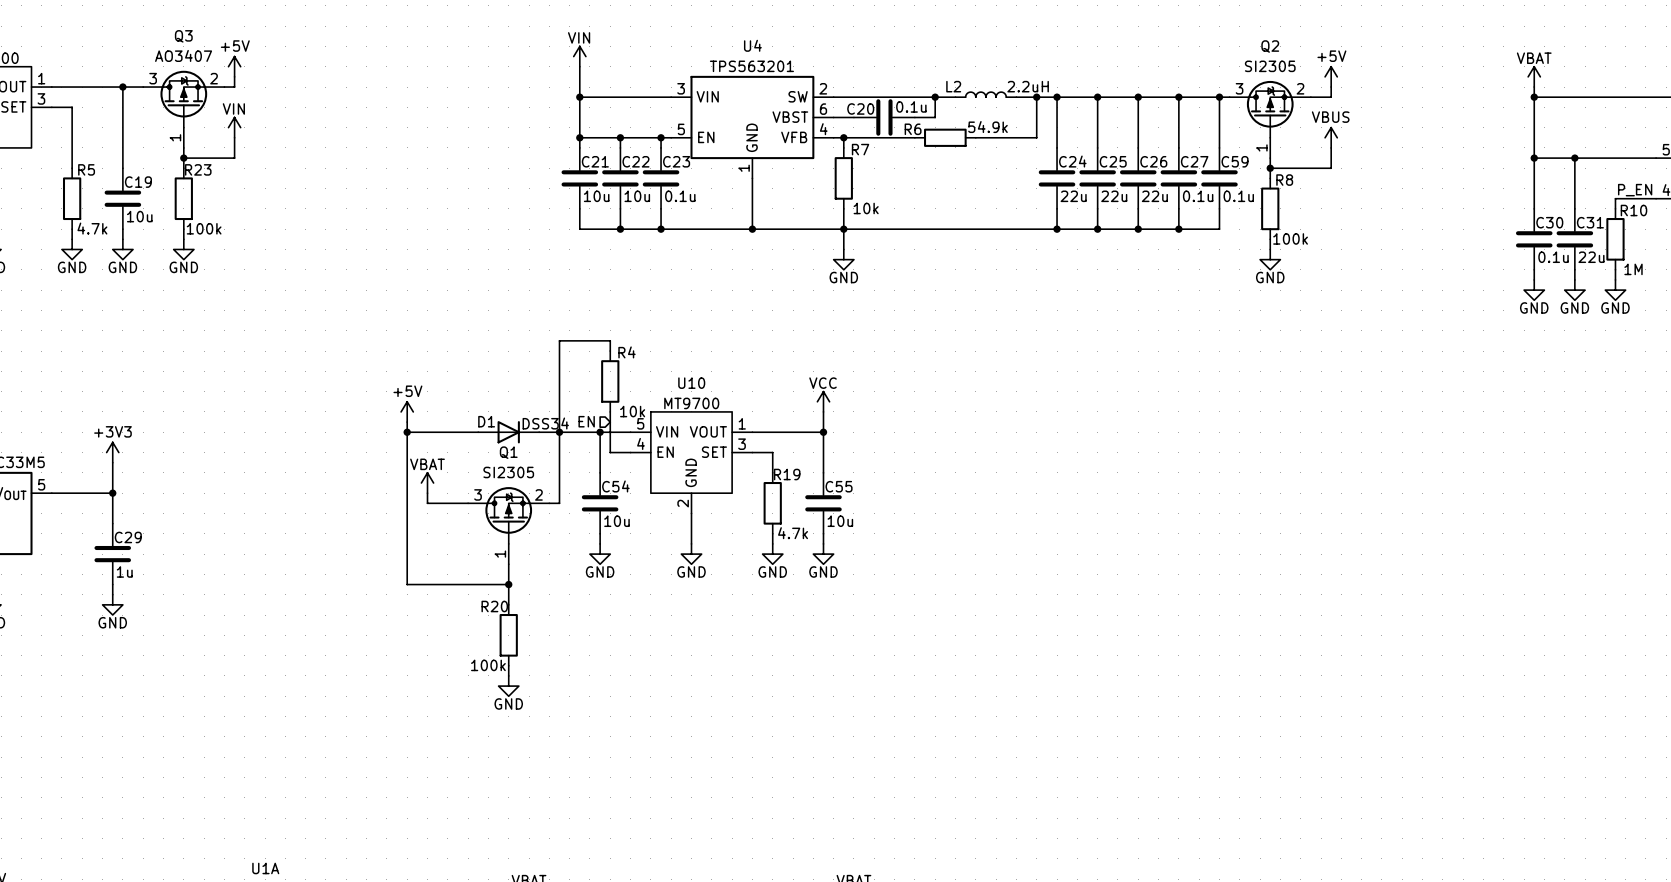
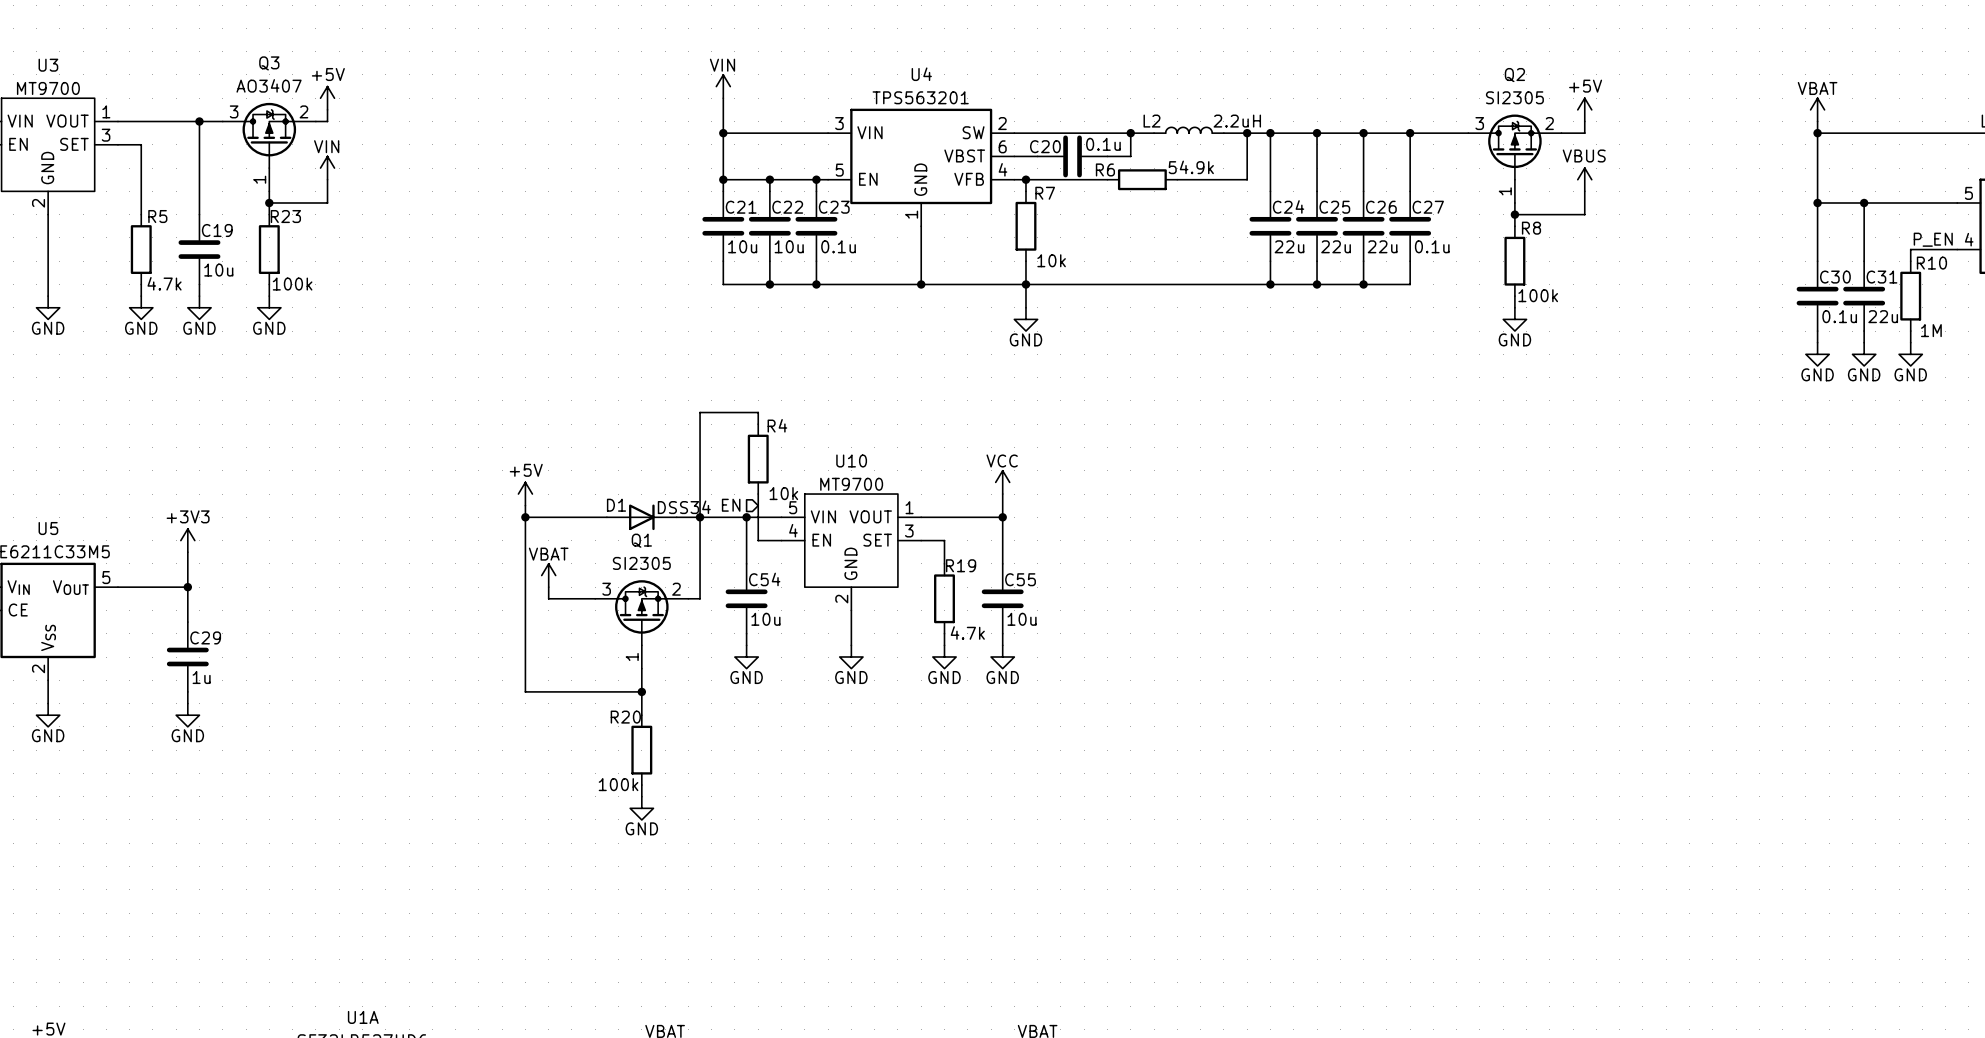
wire: (1219, 97) (1219, 147) -> none
junction: (1219, 97) -> none
C59: 0.1u (1219, 178) -> none
wire: (1219, 208) (1219, 229) (1178, 229) -> none
junction: (1178, 229) -> none

